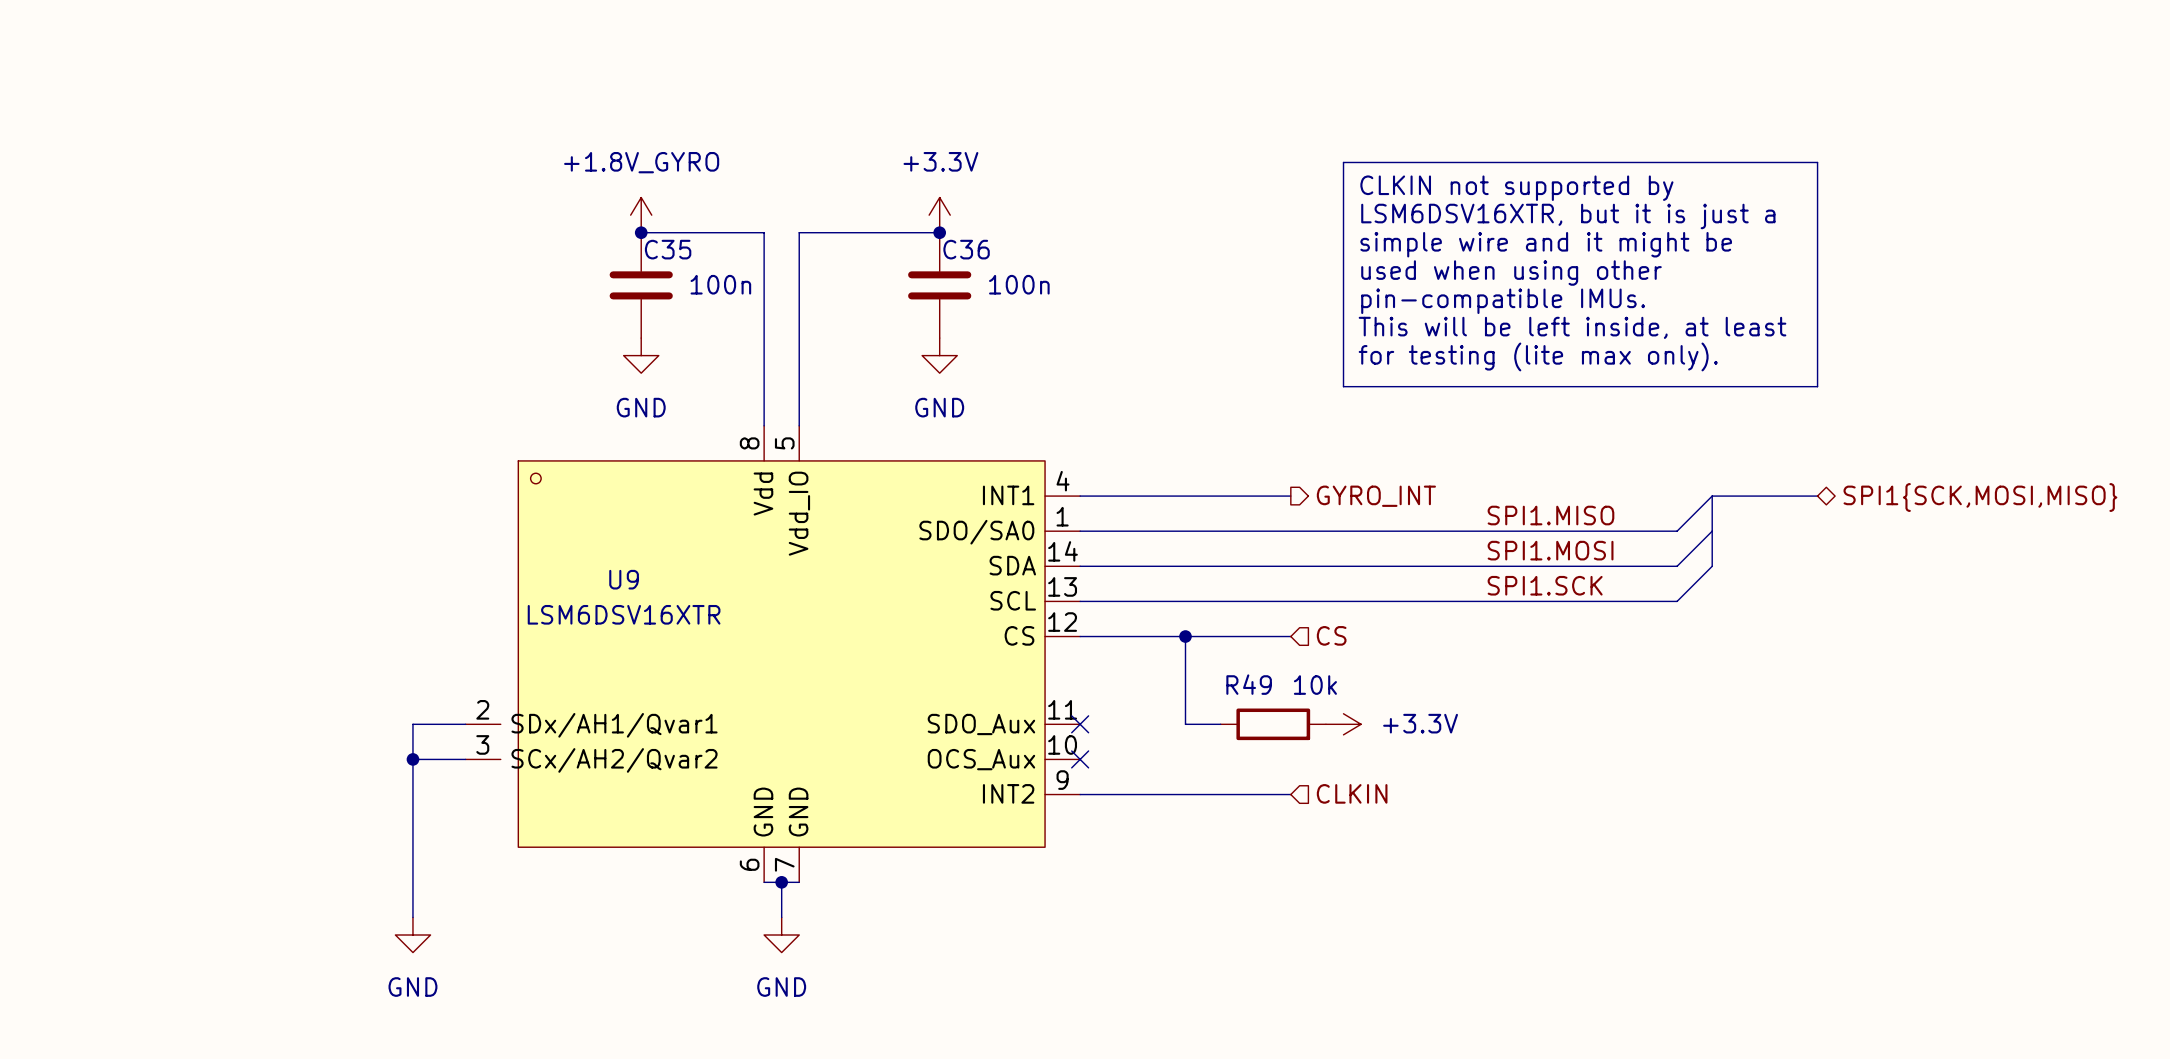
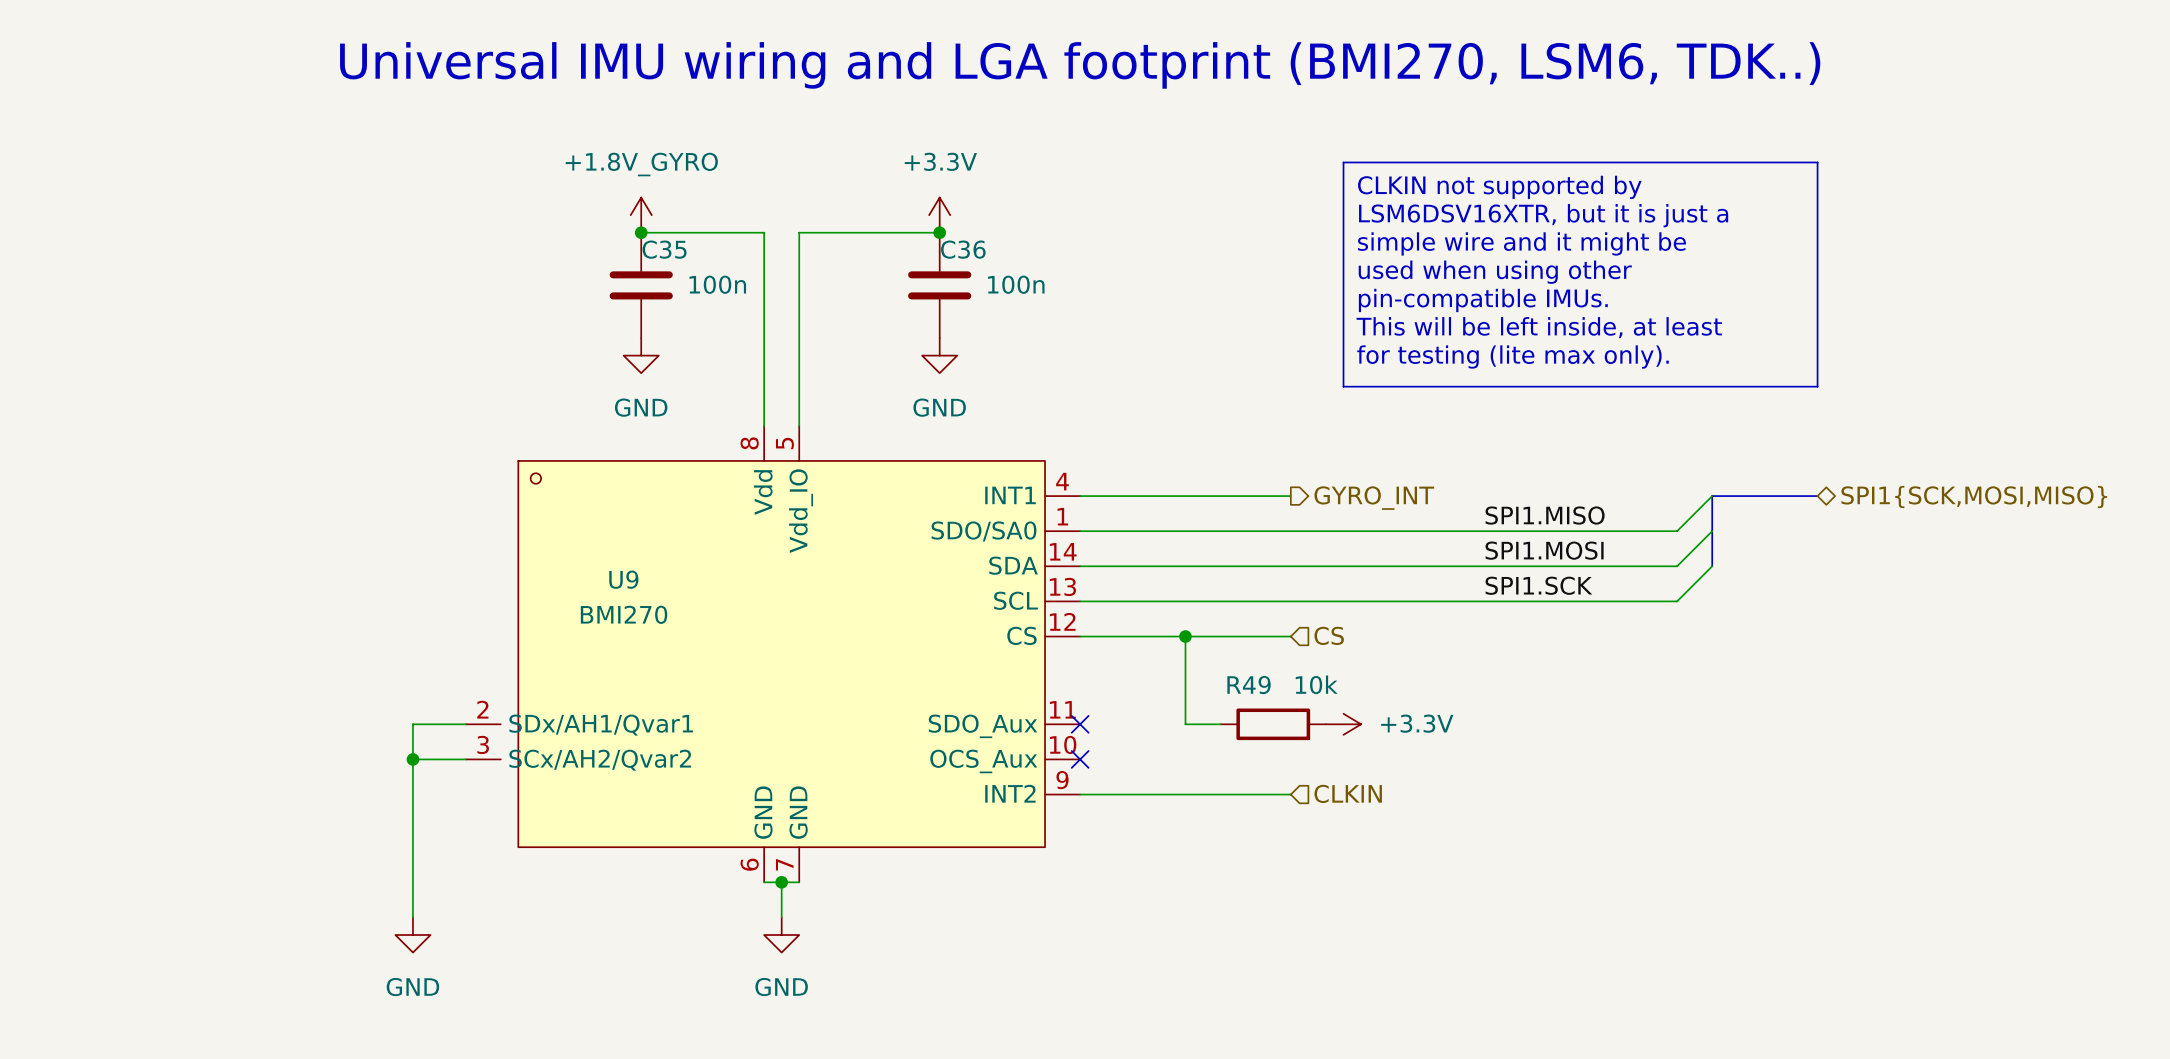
text: none -> Universal IMU wiring and LGA footprint (BMI270, LSM6, TDK..) (1080, 65)
U9 value: LSM6DSV16XTR (624, 614) -> BMI270 (624, 614)

